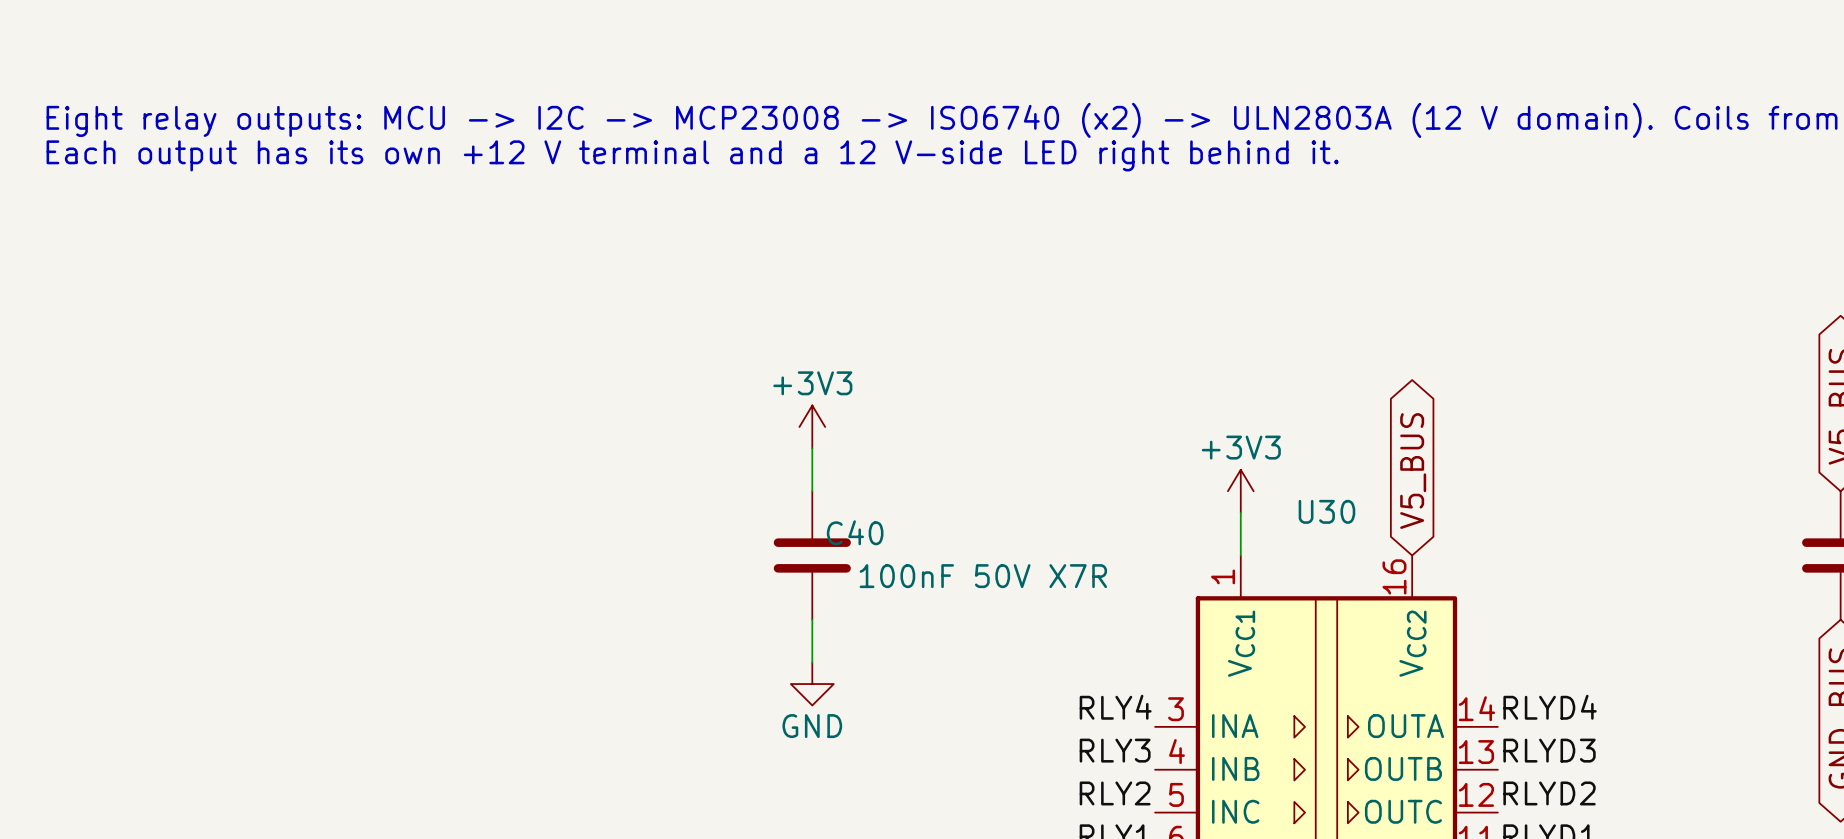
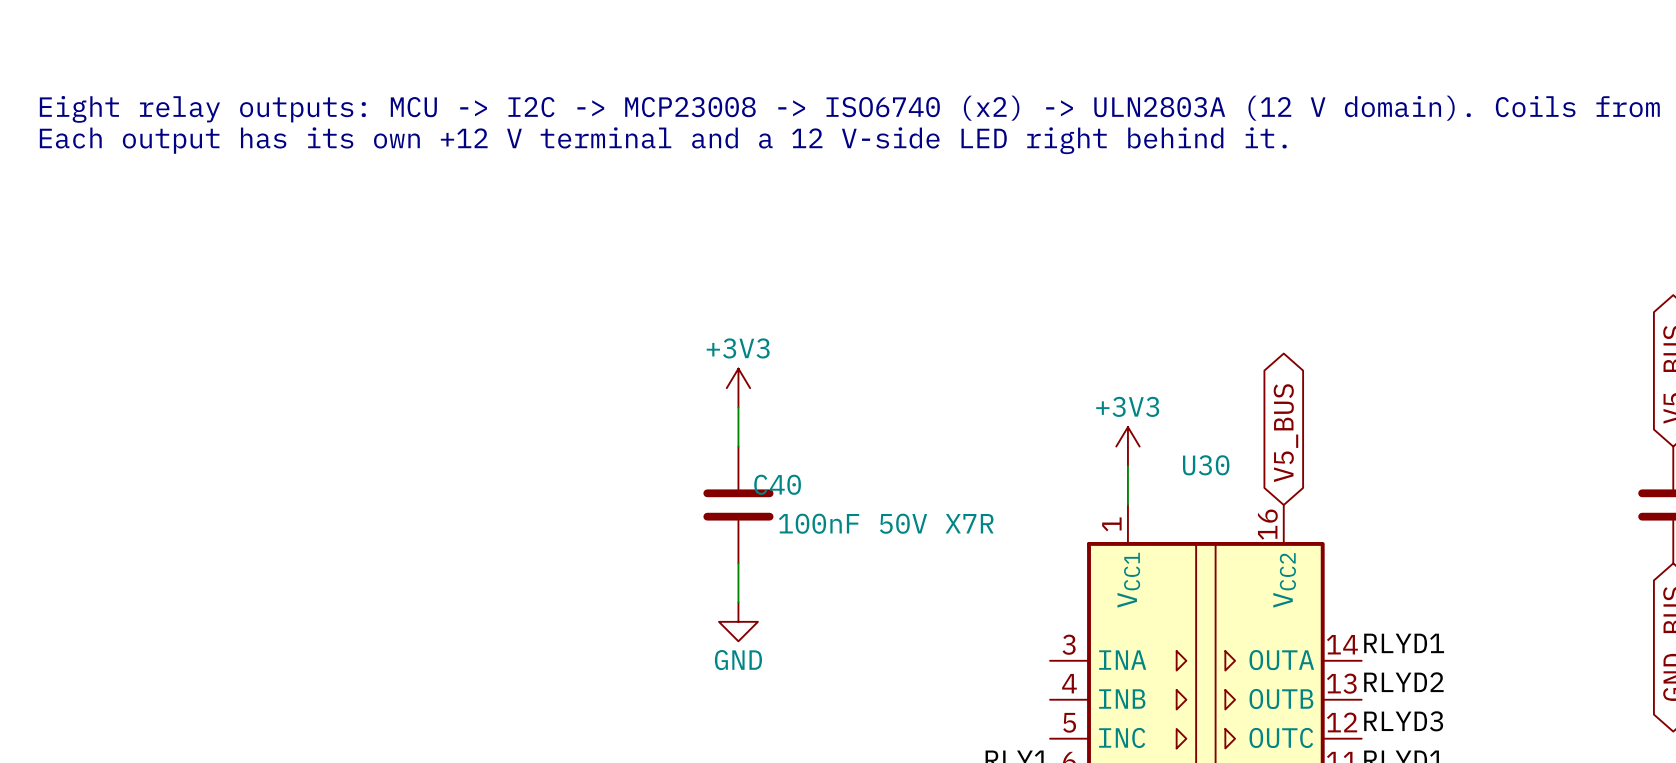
label: RLY4 (1115, 707) -> none
label: RLYD4 (1550, 707) -> RLYD1 (1404, 643)
label: RLY3 (1115, 750) -> none
label: RLYD3 (1549, 750) -> RLYD2 (1403, 682)
label: RLY2 (1115, 793) -> none
label: RLYD2 (1549, 793) -> RLYD3 (1403, 721)

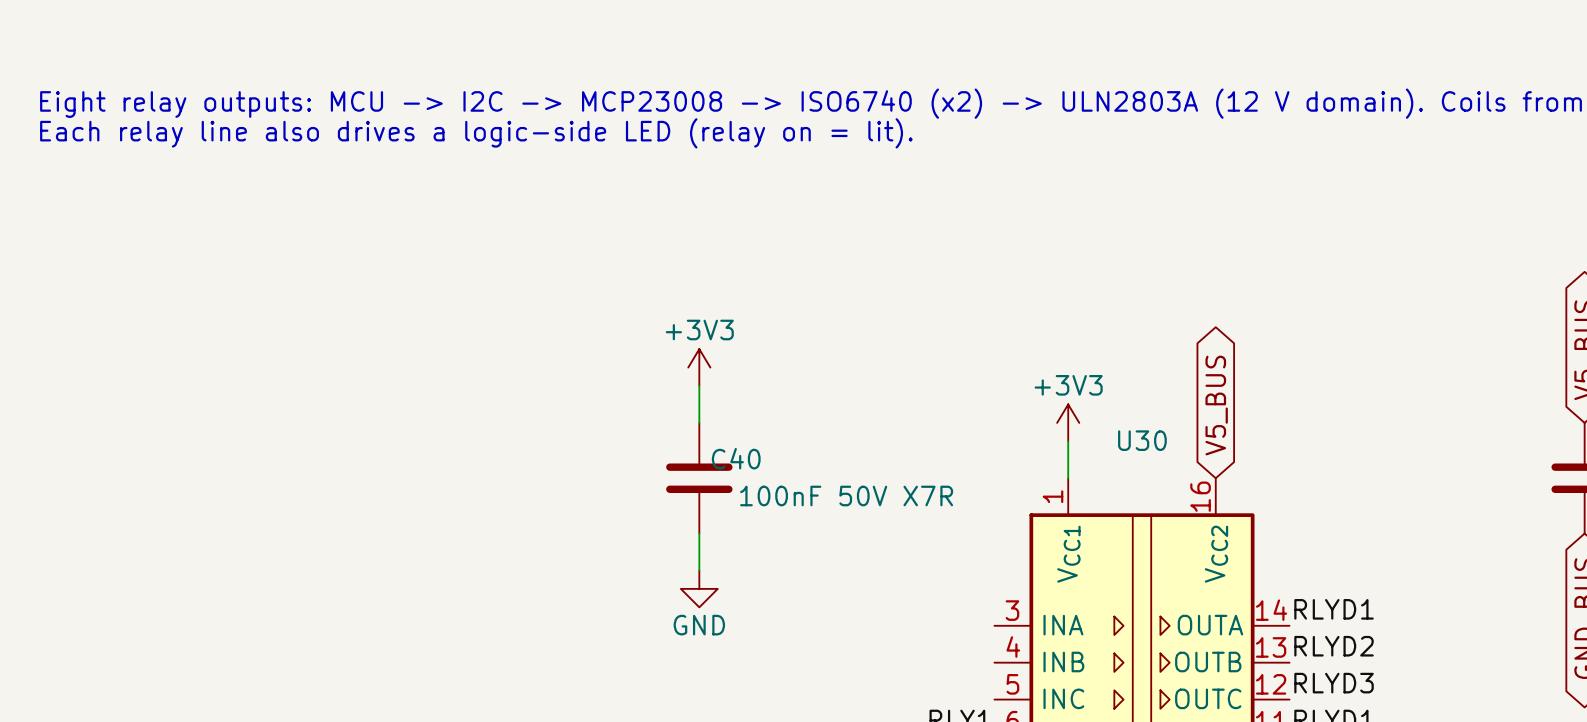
text: Each output has its own +12 V terminal and a 12 V-side LED right behind it. (663, 140) -> Each relay line also drives a logic-side LED (relay on = lit). (476, 133)

